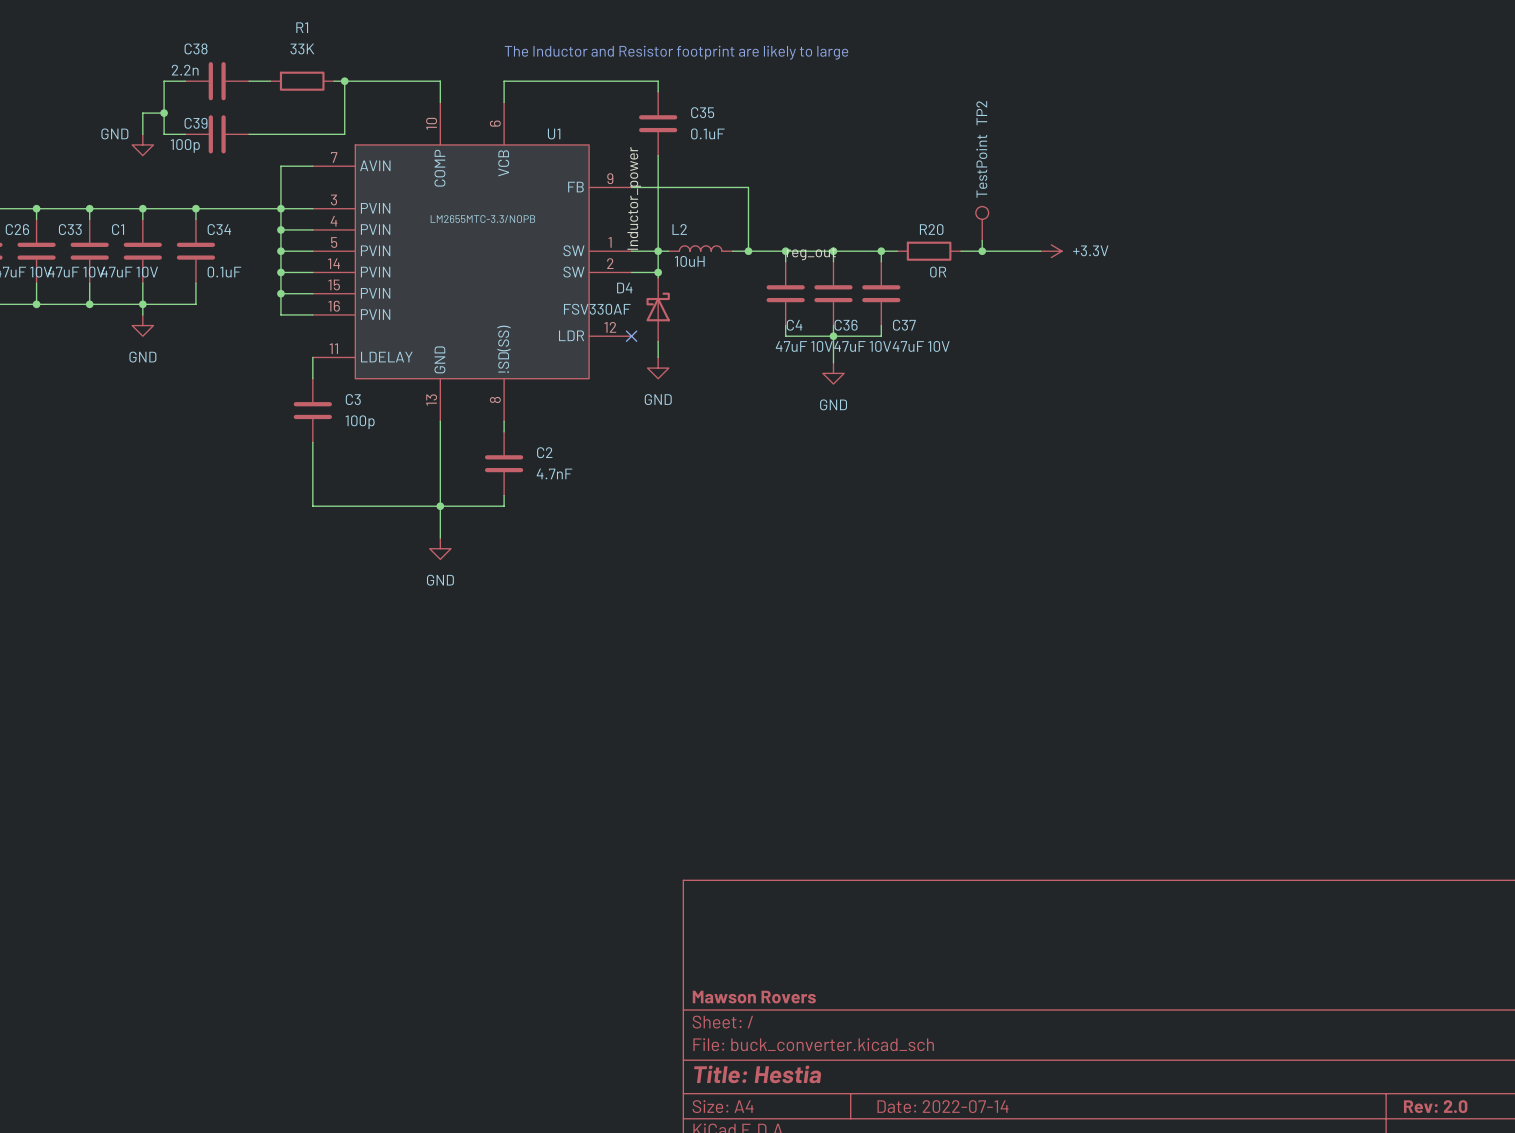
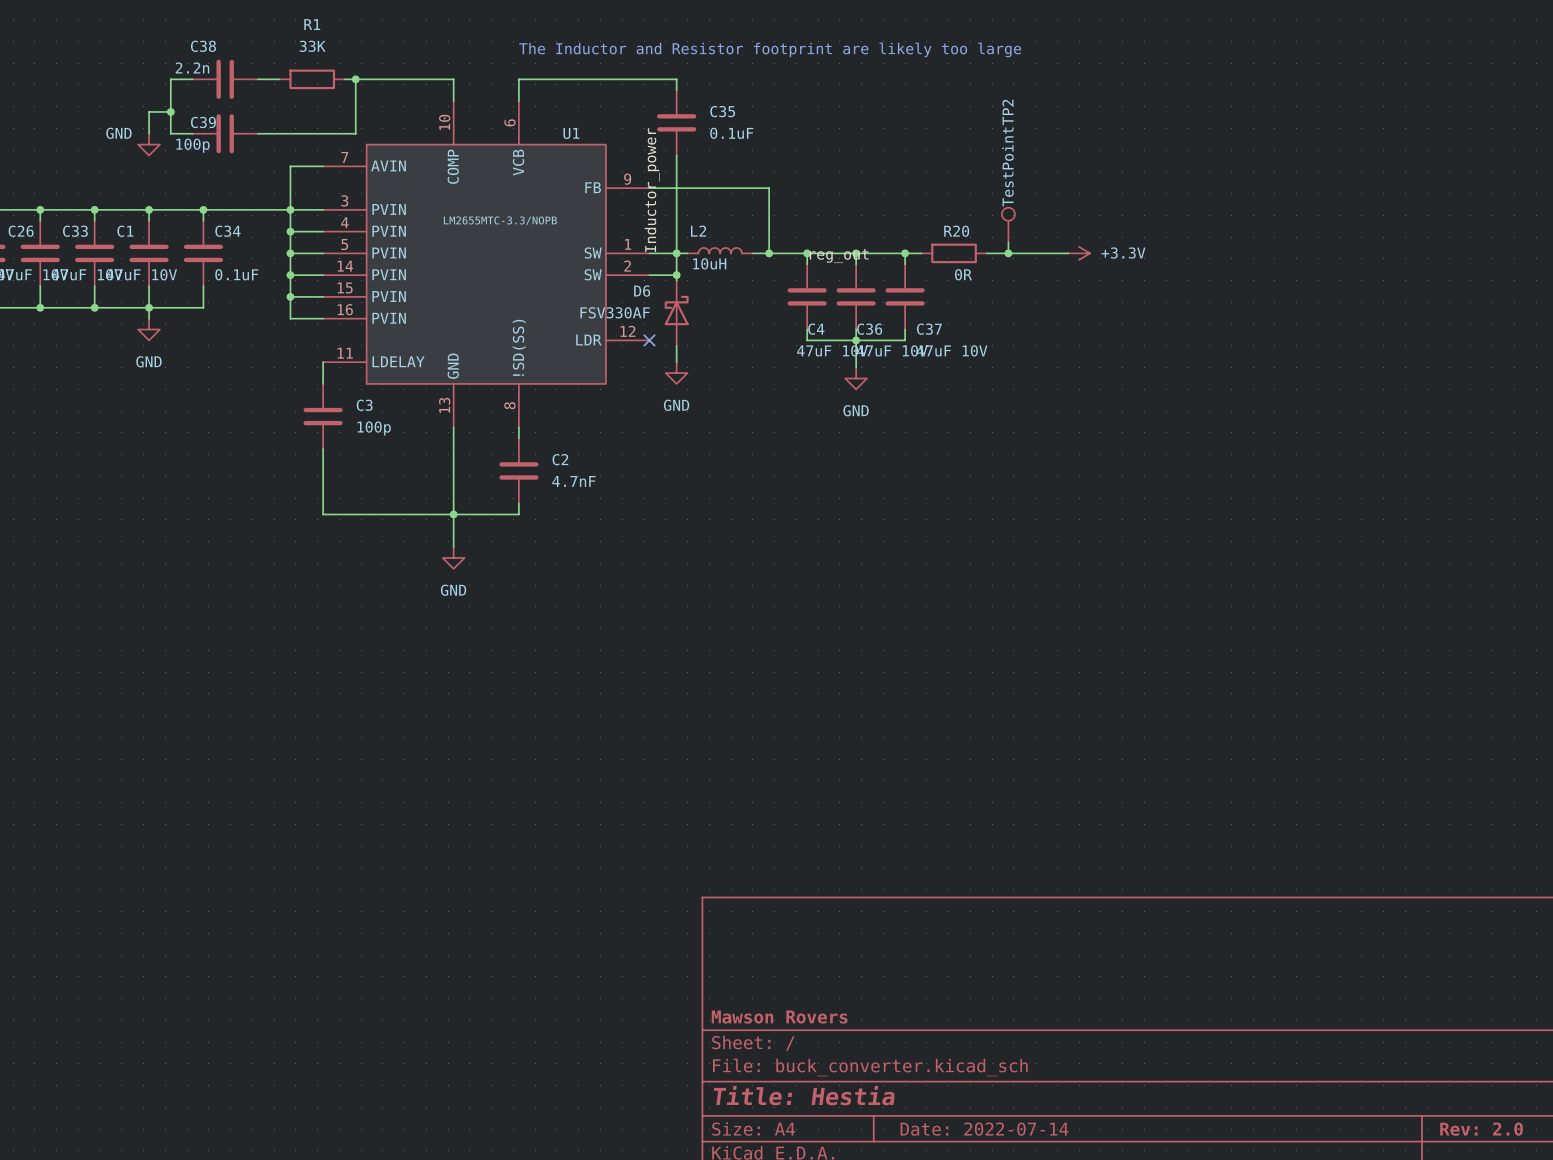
text: The Inductor and Resistor footprint are likely to large (676, 52) -> The Inductor and Resistor footprint are likely too large (770, 50)
D4 name: D4 (624, 288) -> D6 (642, 291)

